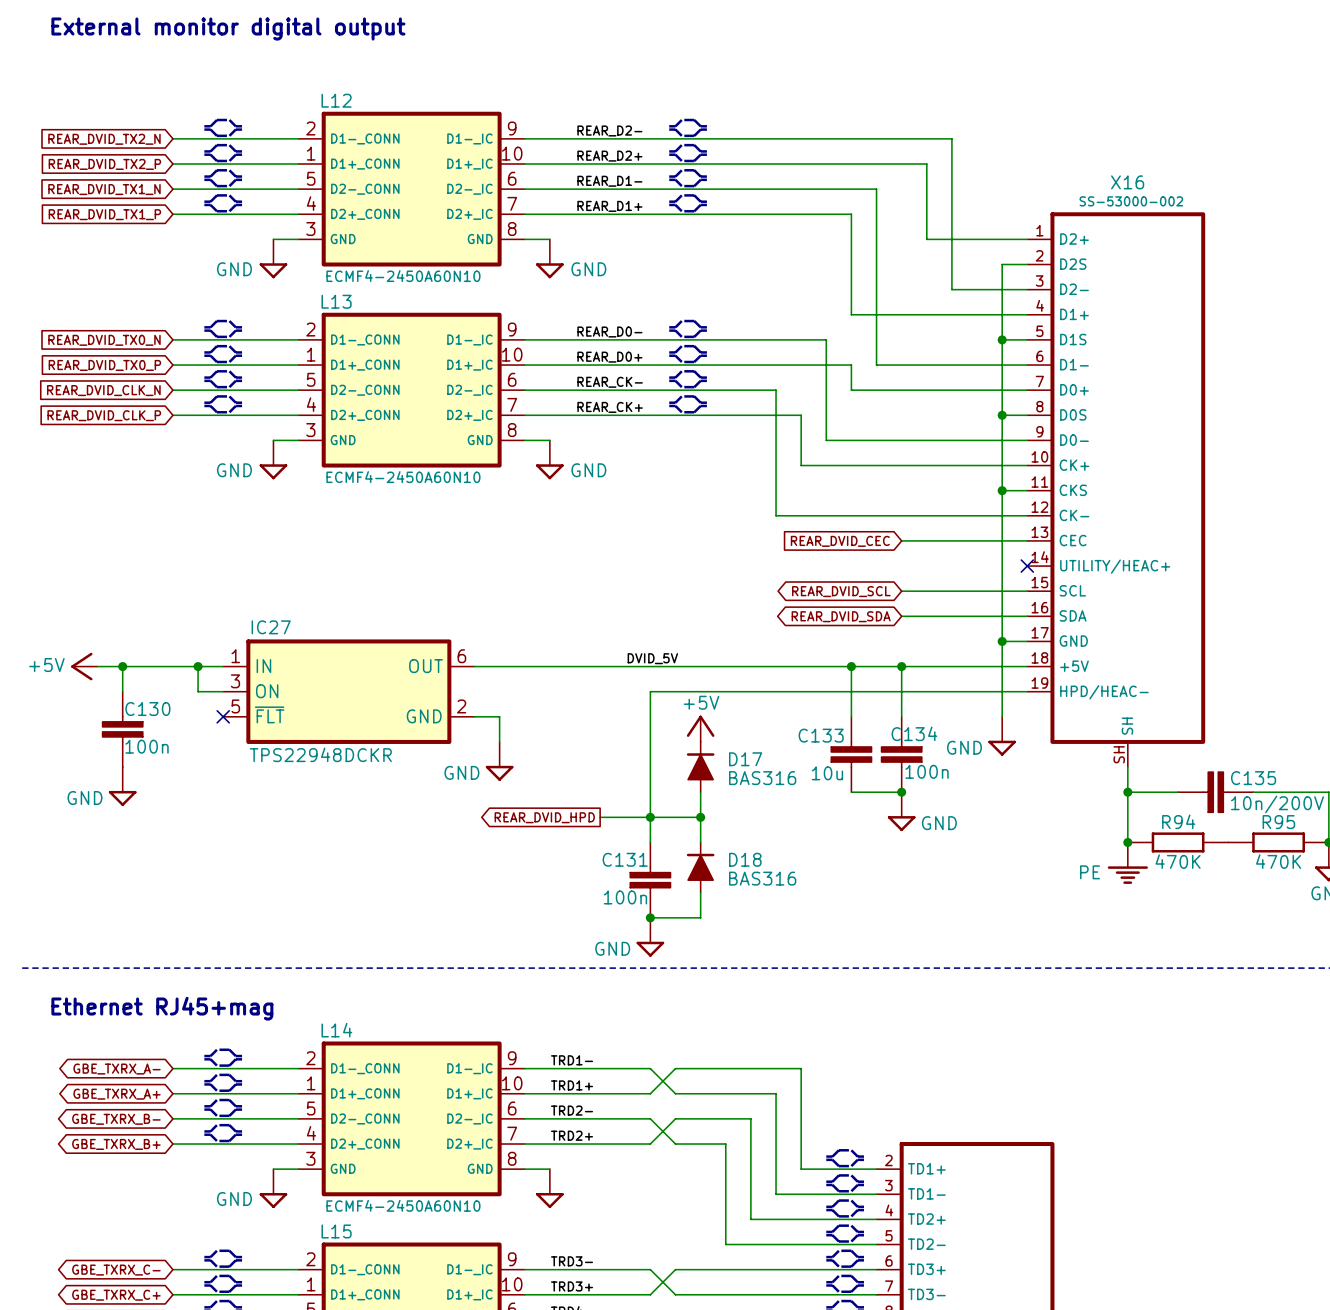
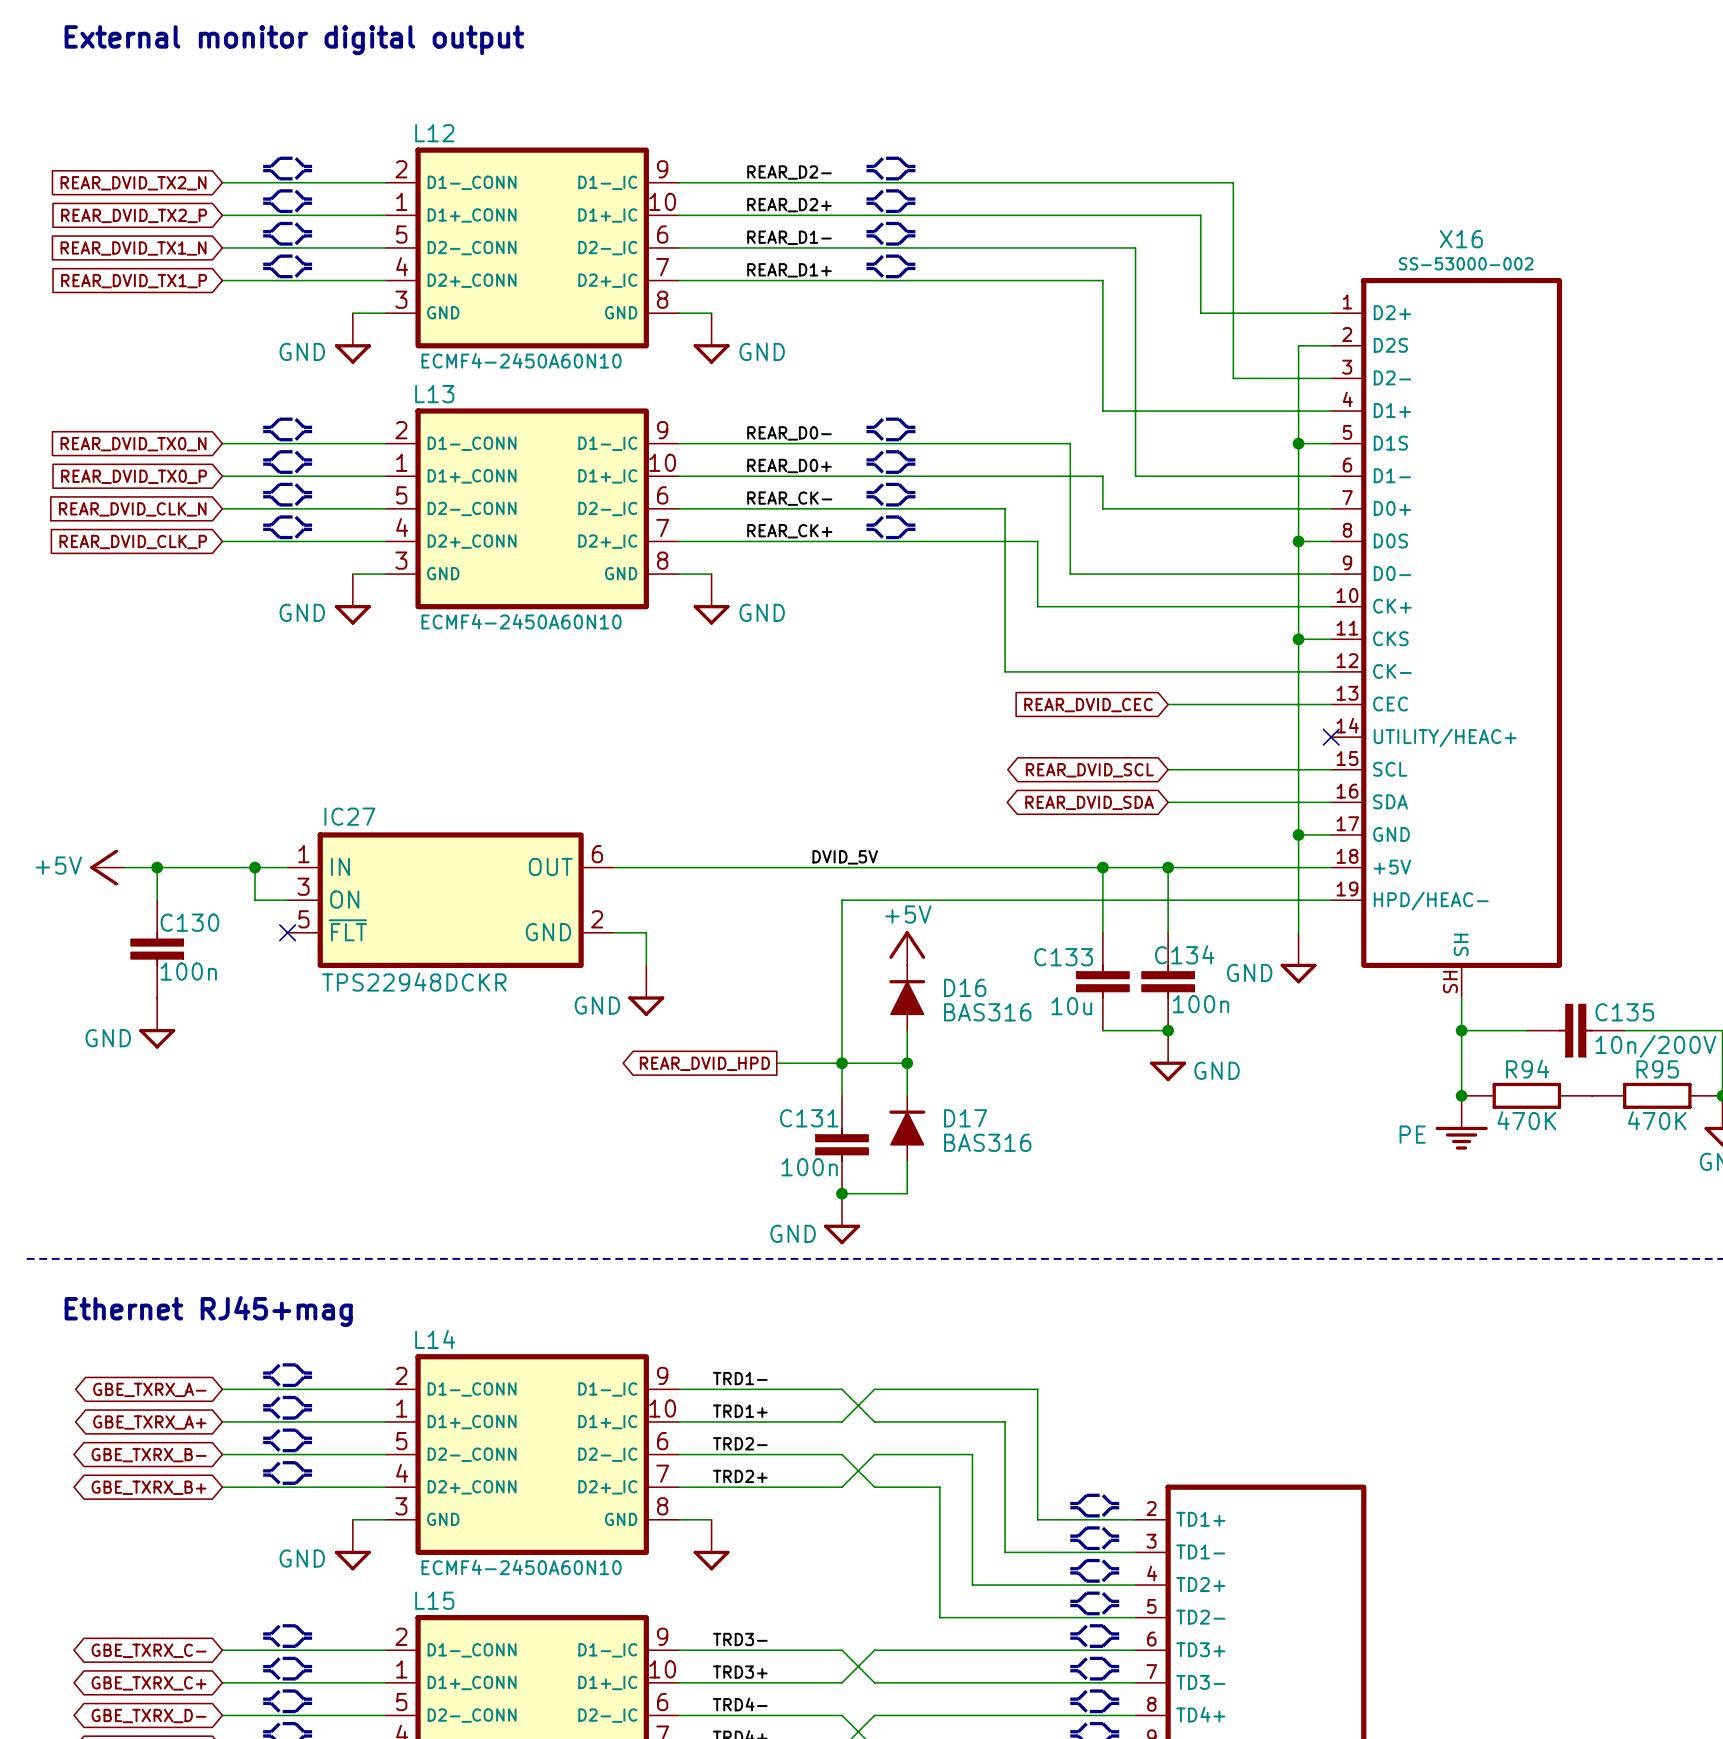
D17 name: D17 (745, 759) -> D16 (965, 987)
D18 name: D18 (745, 859) -> D17 (965, 1118)

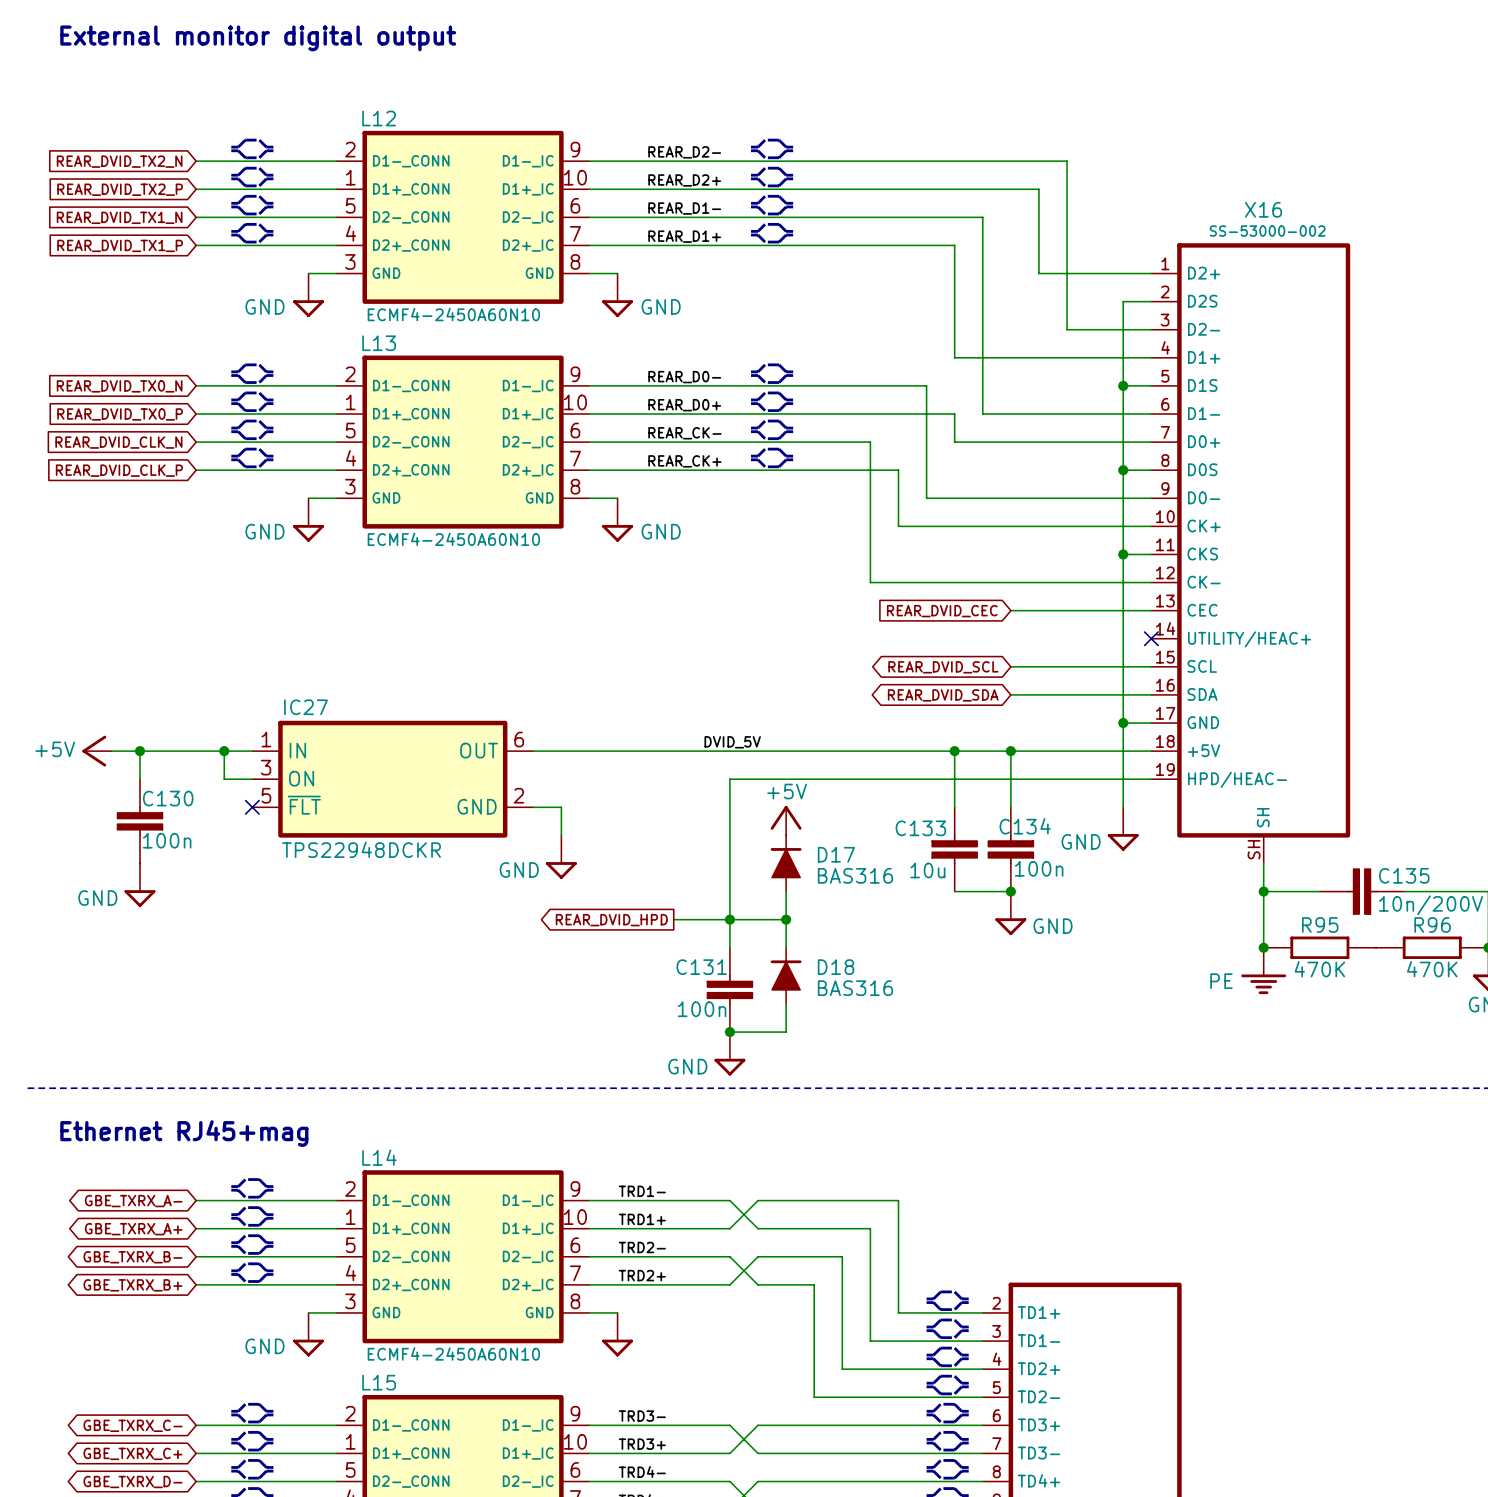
D16 name: D16 (965, 987) -> D17 (836, 854)
R94 name: R94 (1527, 1069) -> R95 (1320, 924)
R95 name: R95 (1657, 1069) -> R96 (1432, 924)
D17 name: D17 (965, 1118) -> D18 (836, 967)

